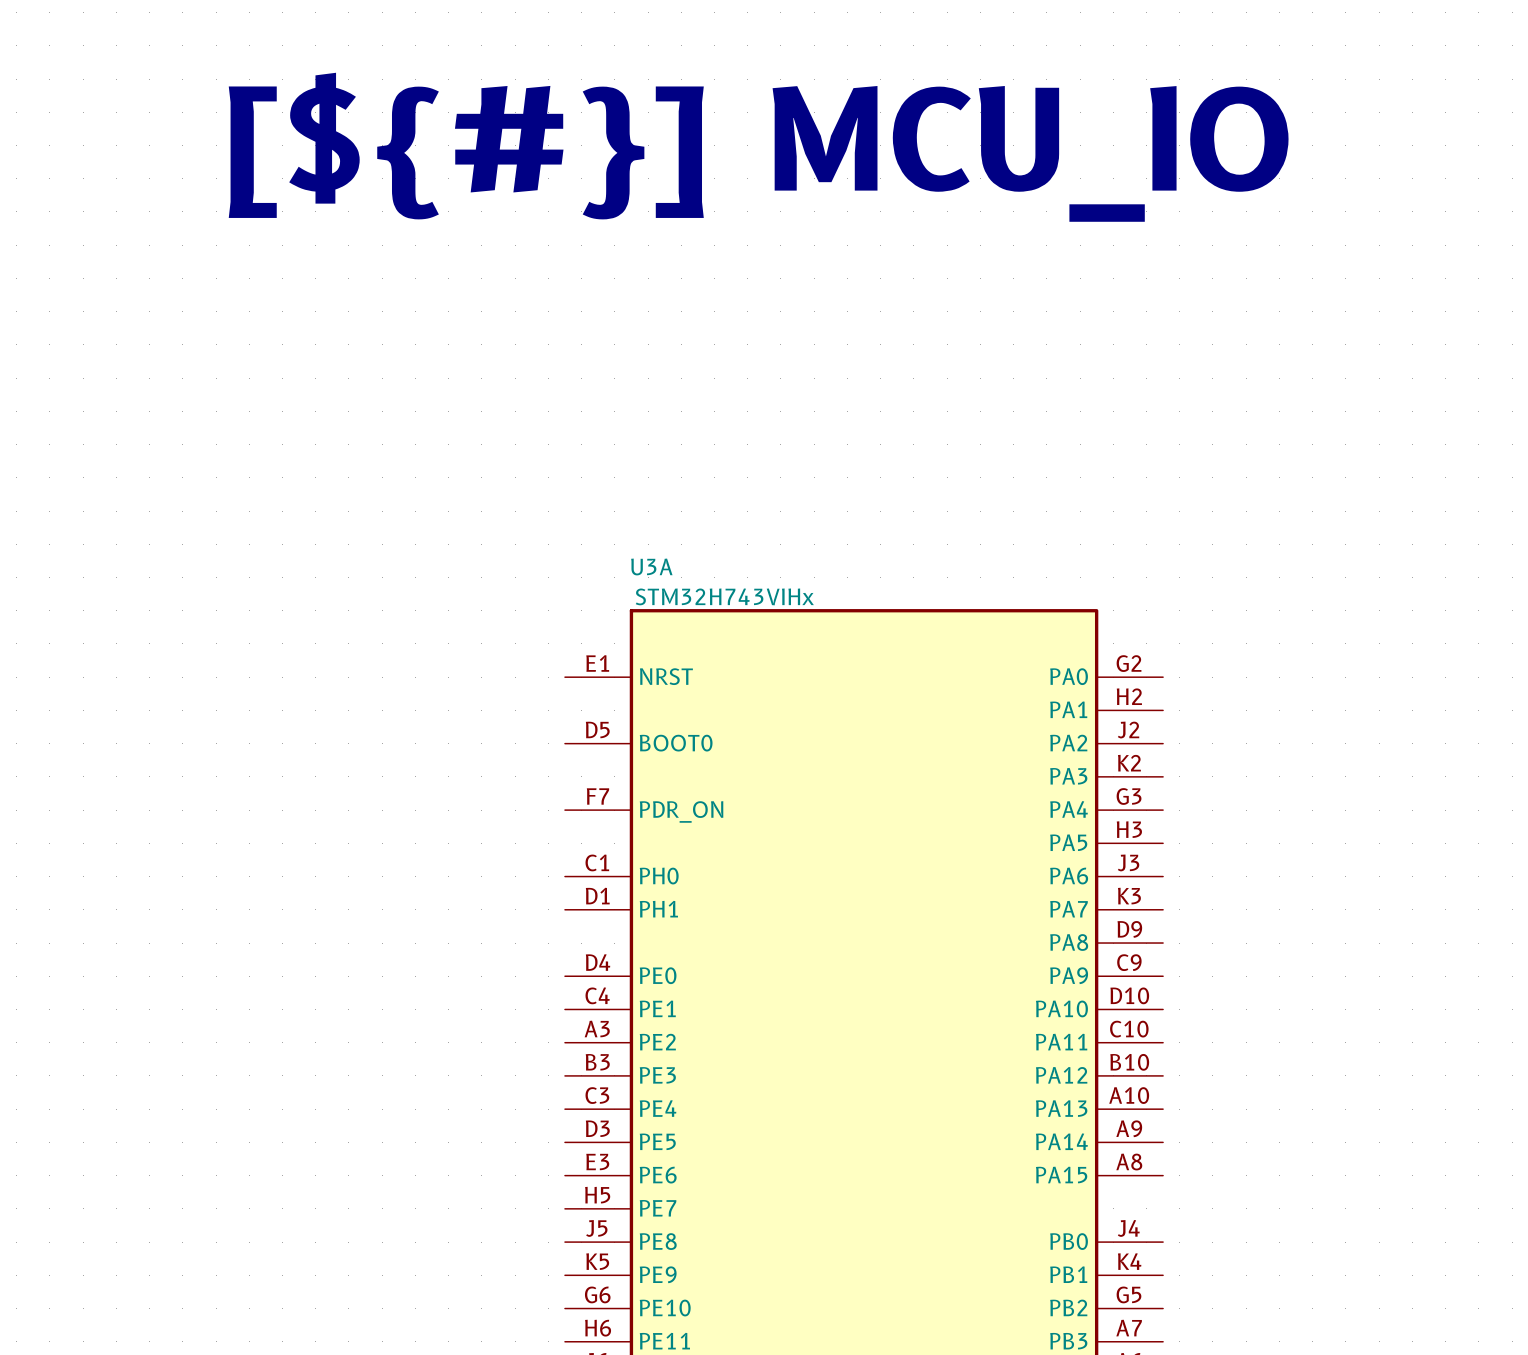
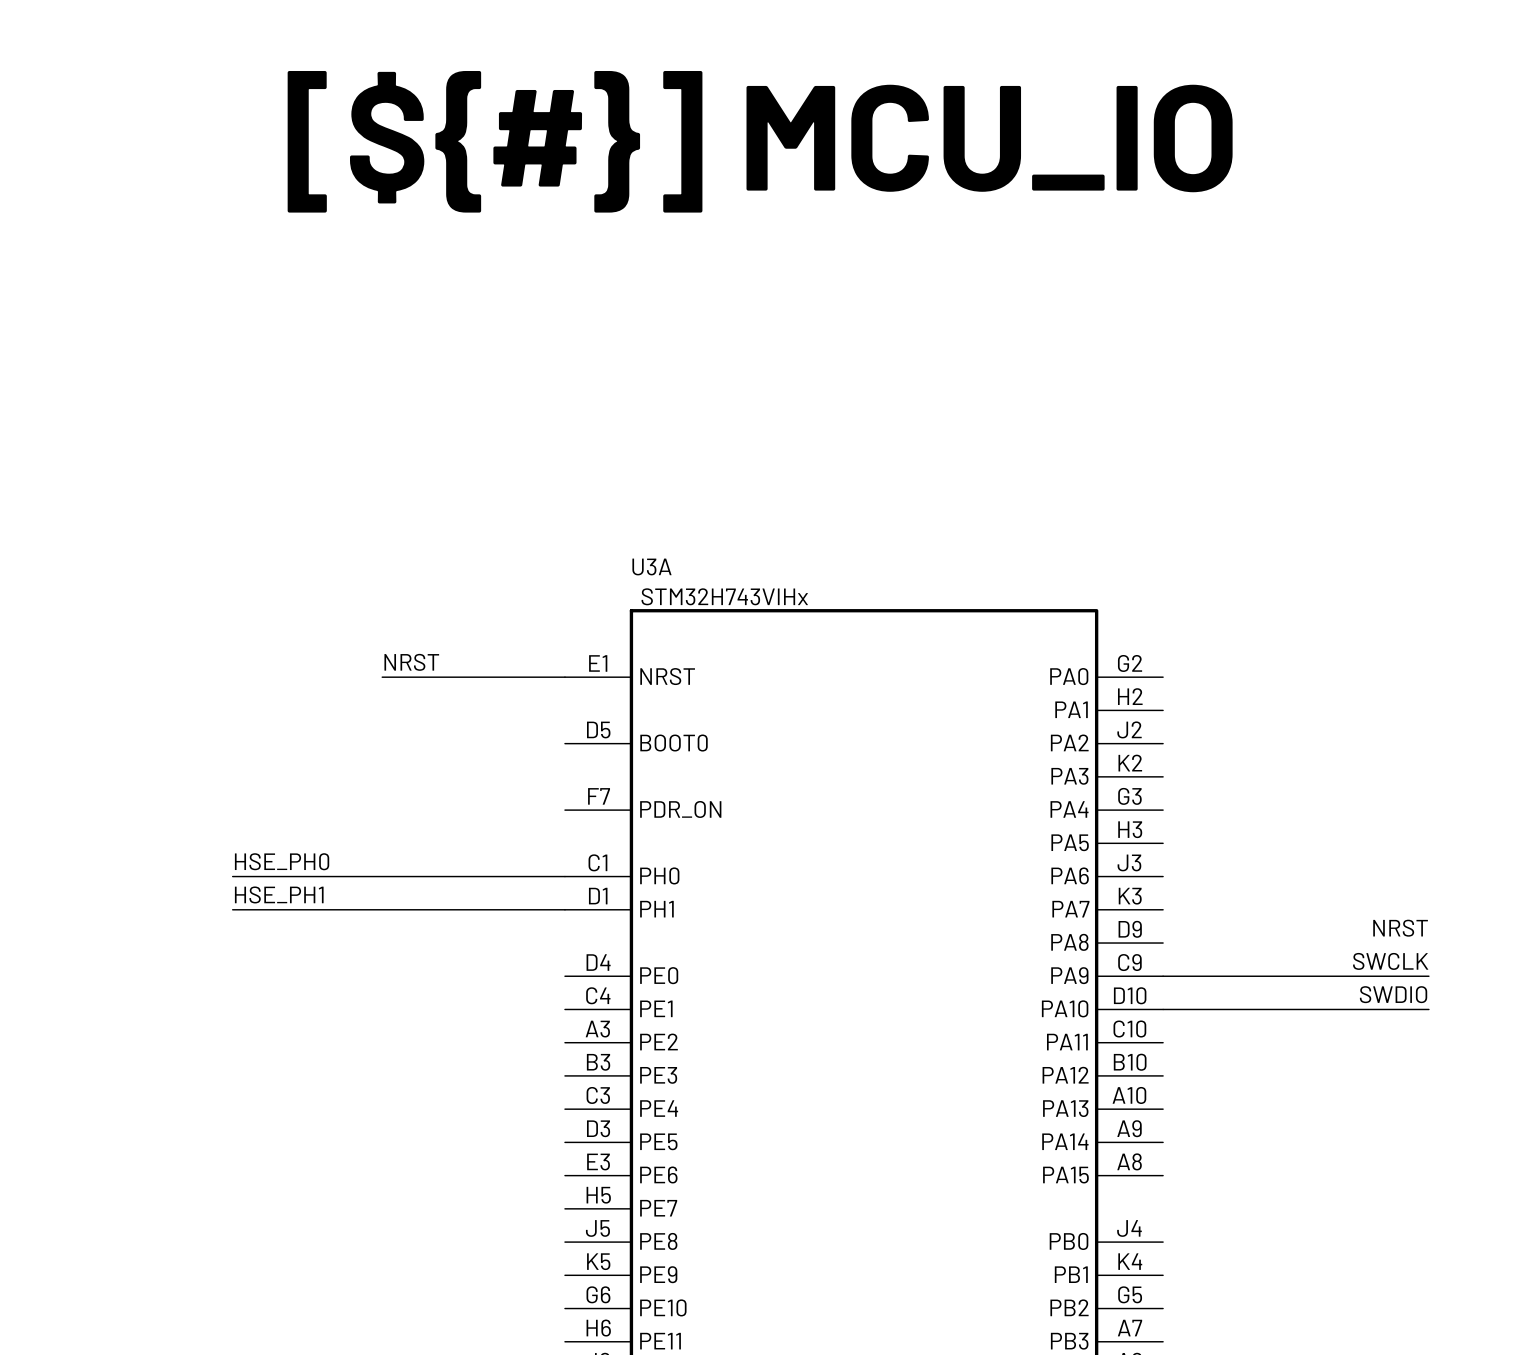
label: none -> NRST (411, 662)
wire: none -> (382, 677) (564, 677)
label: none -> HSE_PH0 (282, 861)
wire: none -> (232, 876) (564, 876)
label: none -> HSE_PH1 (279, 894)
wire: none -> (232, 909) (564, 909)
label: none -> NRST (1400, 928)
label: none -> SWCLK (1390, 961)
wire: none -> (1163, 976) (1428, 976)
label: none -> SWDIO (1393, 994)
wire: none -> (1163, 1009) (1428, 1009)

